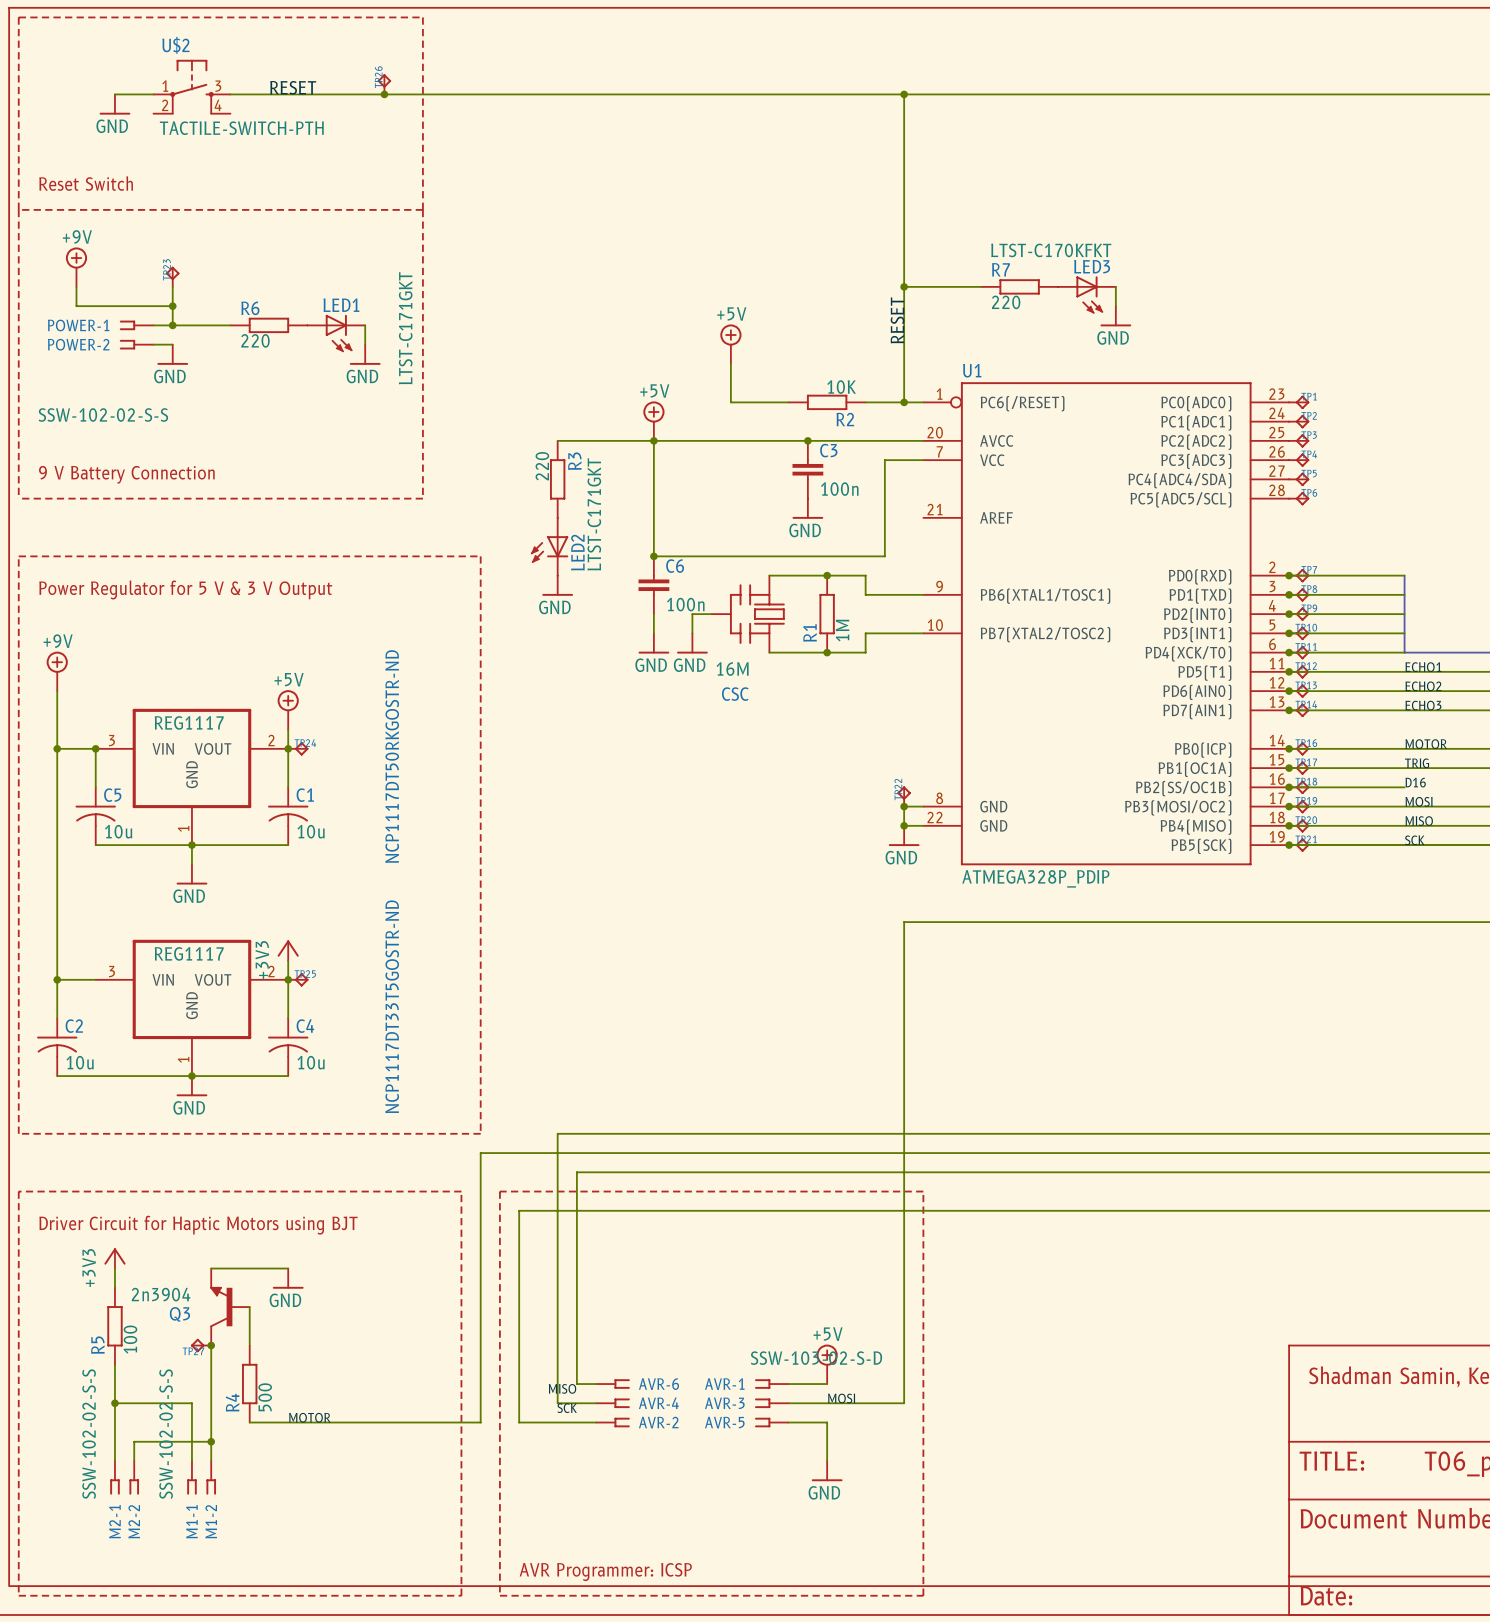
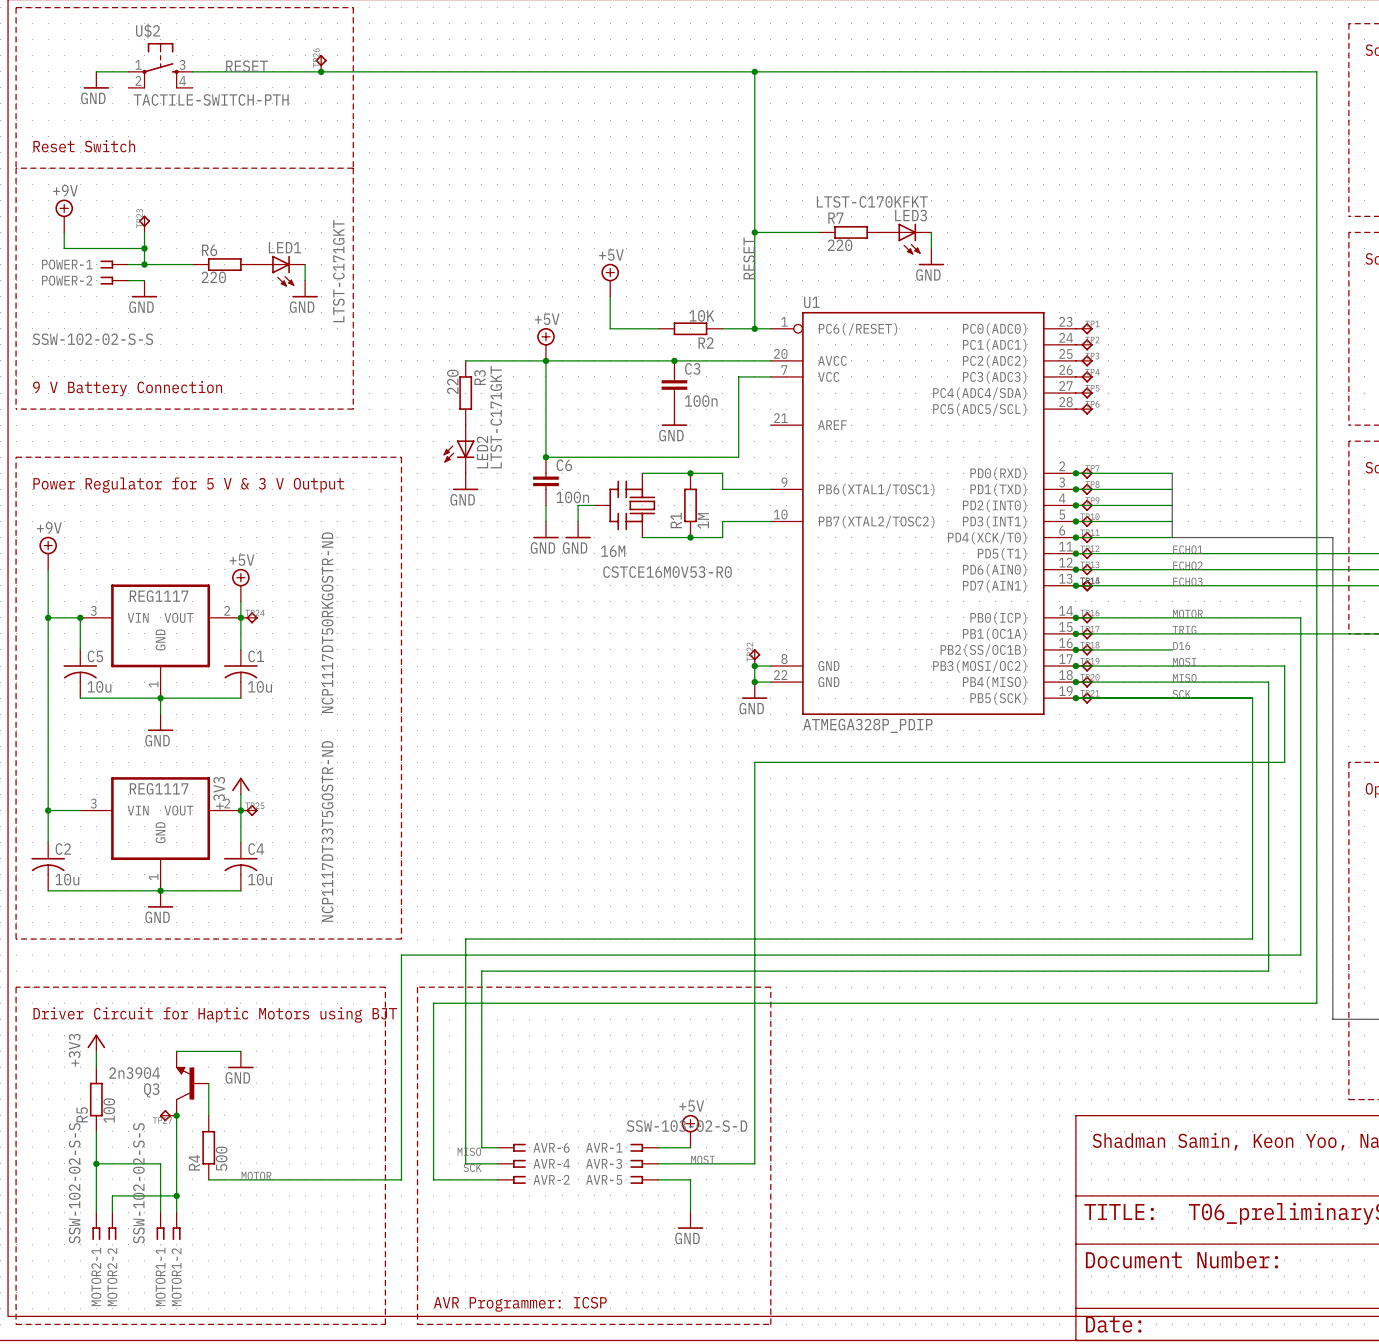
CSC name: CSC (735, 694) -> CSTCE16M0V53-R0 (667, 572)
part: none -> (1084, 585)
M2-1 name: M2-1 (114, 1521) -> MOTOR2-1 (96, 1277)
M2-2 name: M2-2 (134, 1521) -> MOTOR2-2 (112, 1277)
M1-1 name: M1-1 (191, 1521) -> MOTOR1-1 (160, 1277)
M1-2 name: M1-2 (211, 1521) -> MOTOR1-2 (176, 1277)

